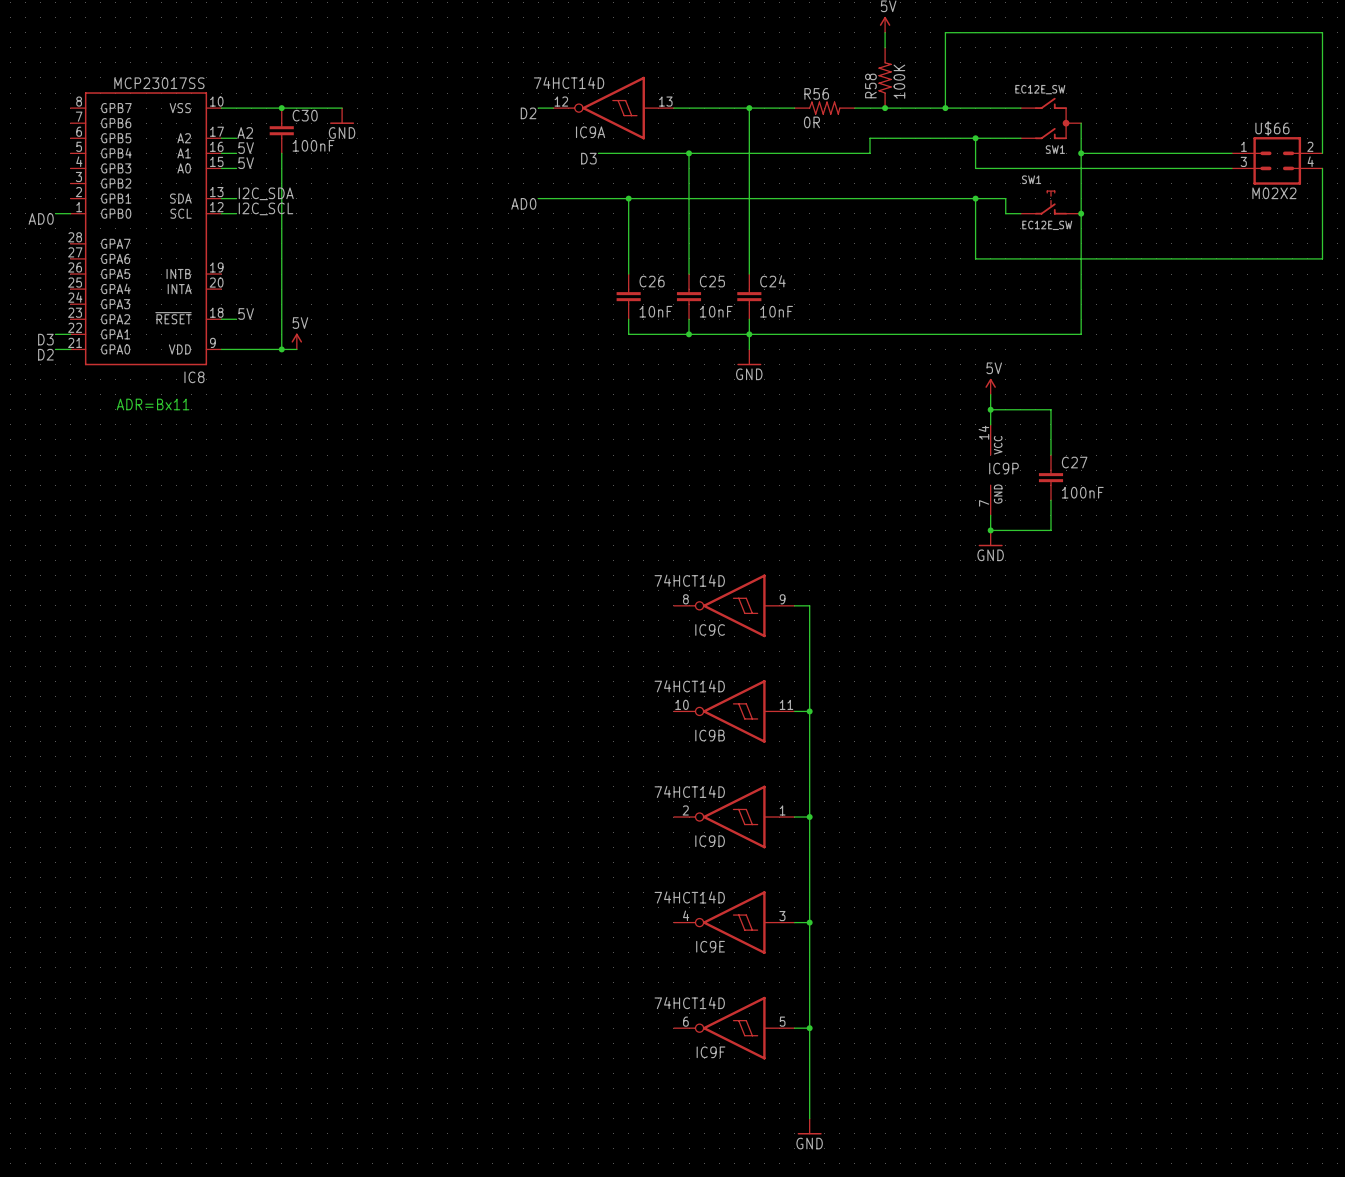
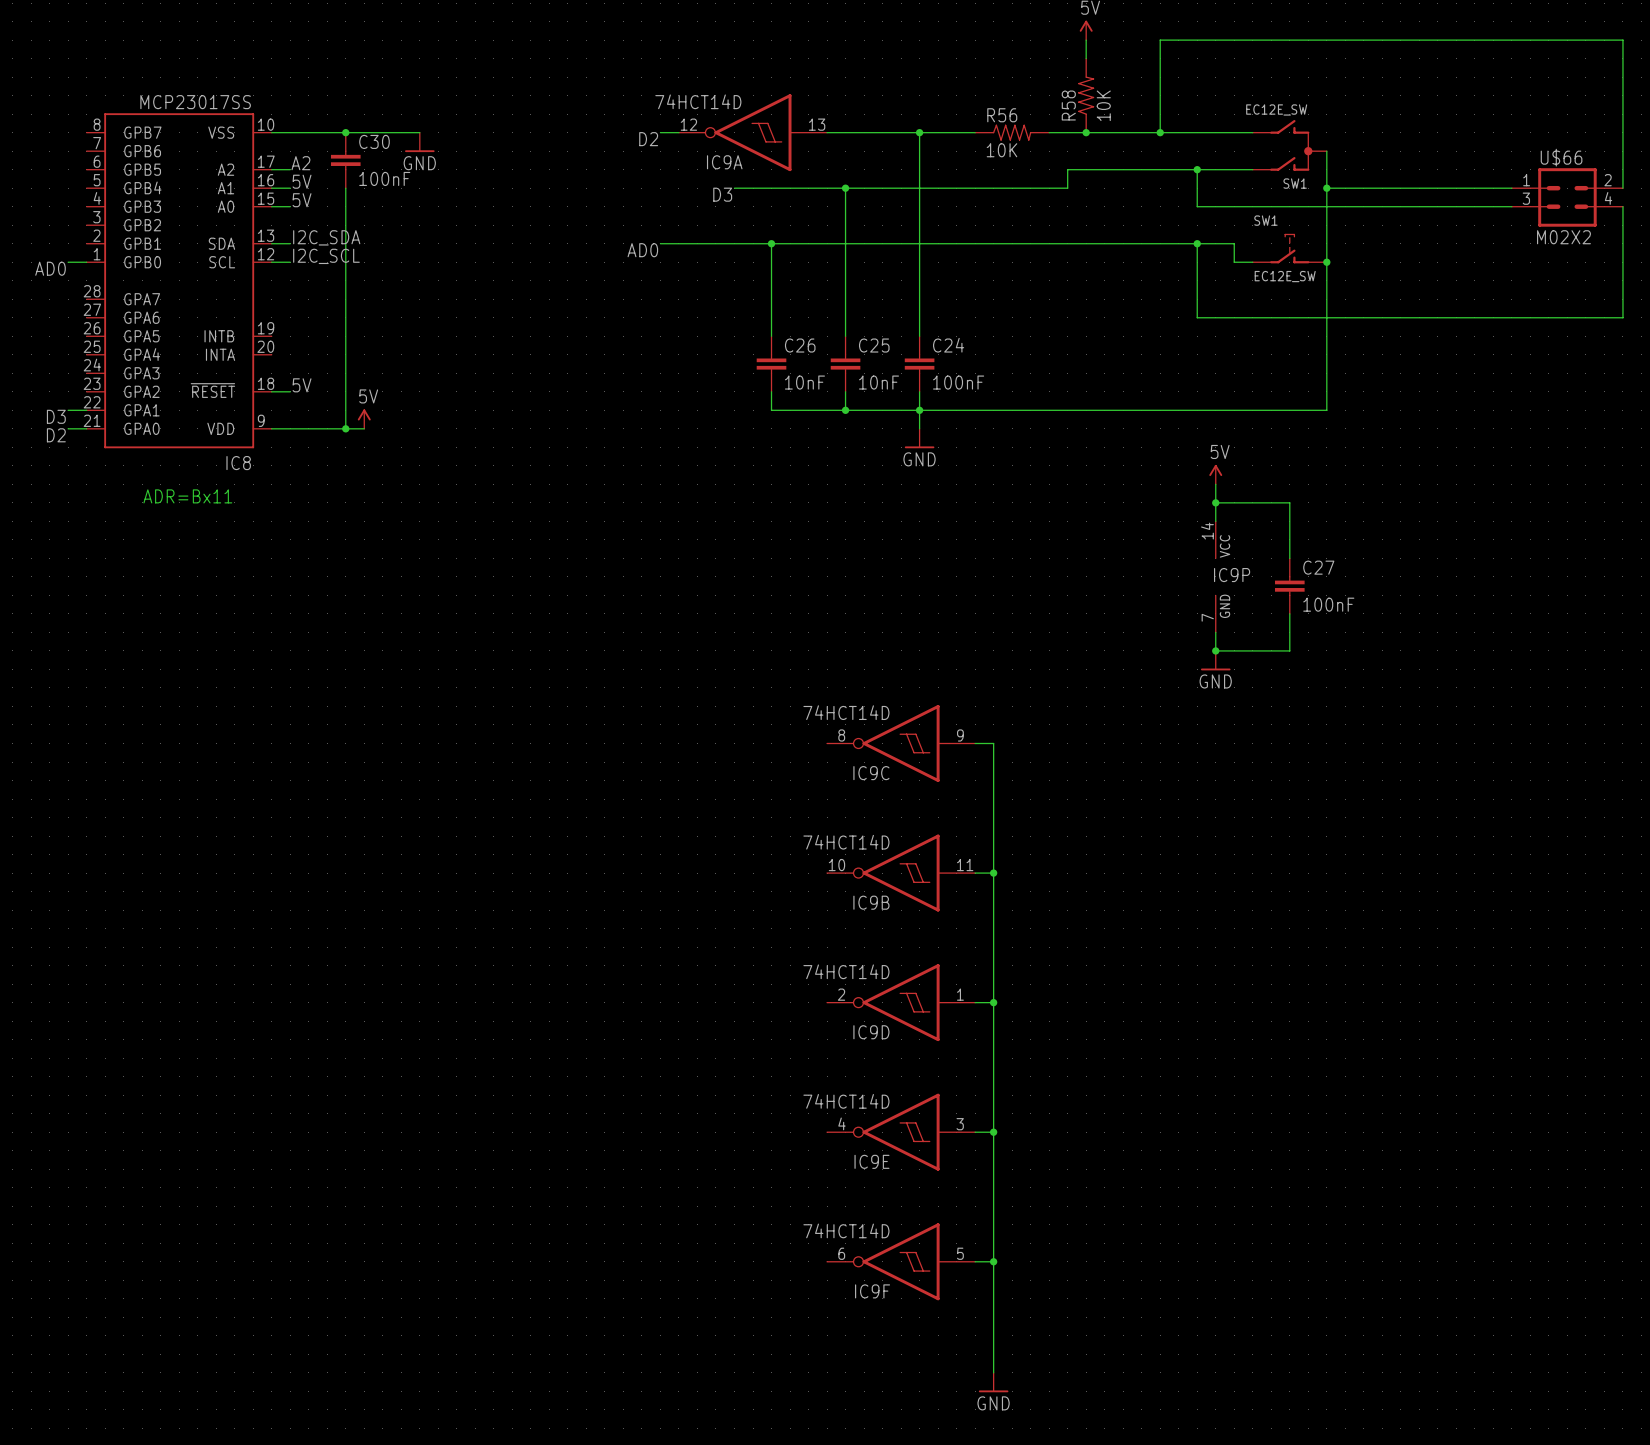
R58 value: 100K (899, 81) -> 10K (1103, 105)
R56 value: 0R (811, 122) -> 10K (1001, 150)
C24 value: 10nF (776, 311) -> 100nF (958, 382)

